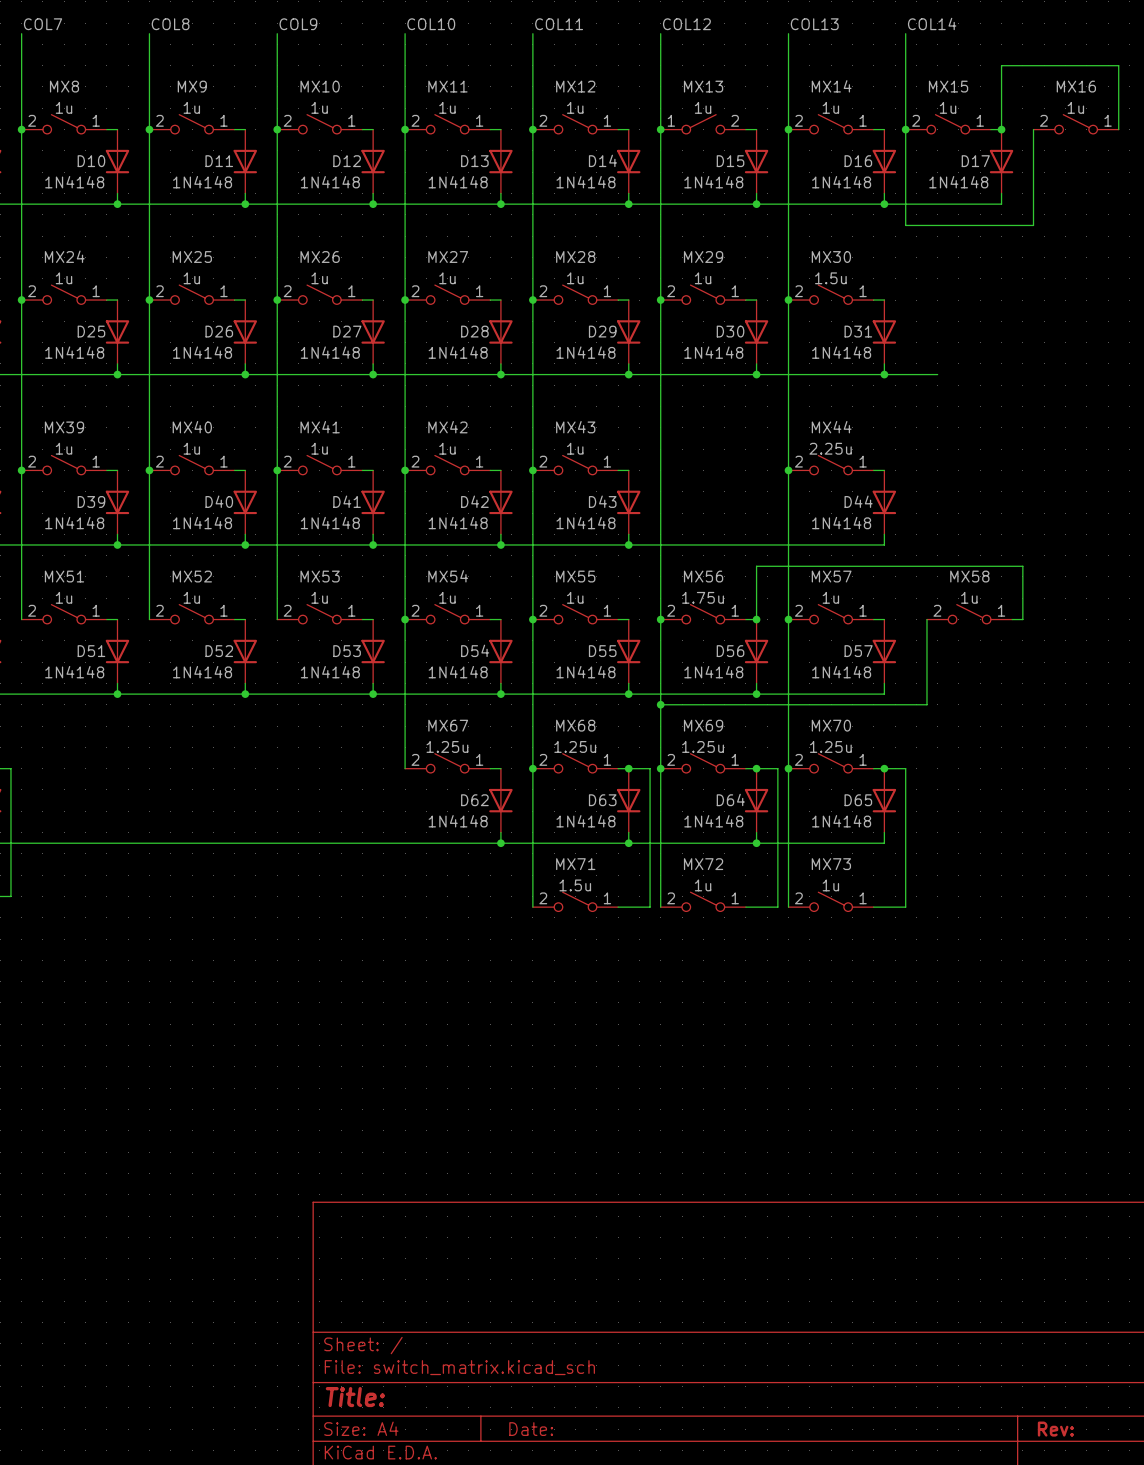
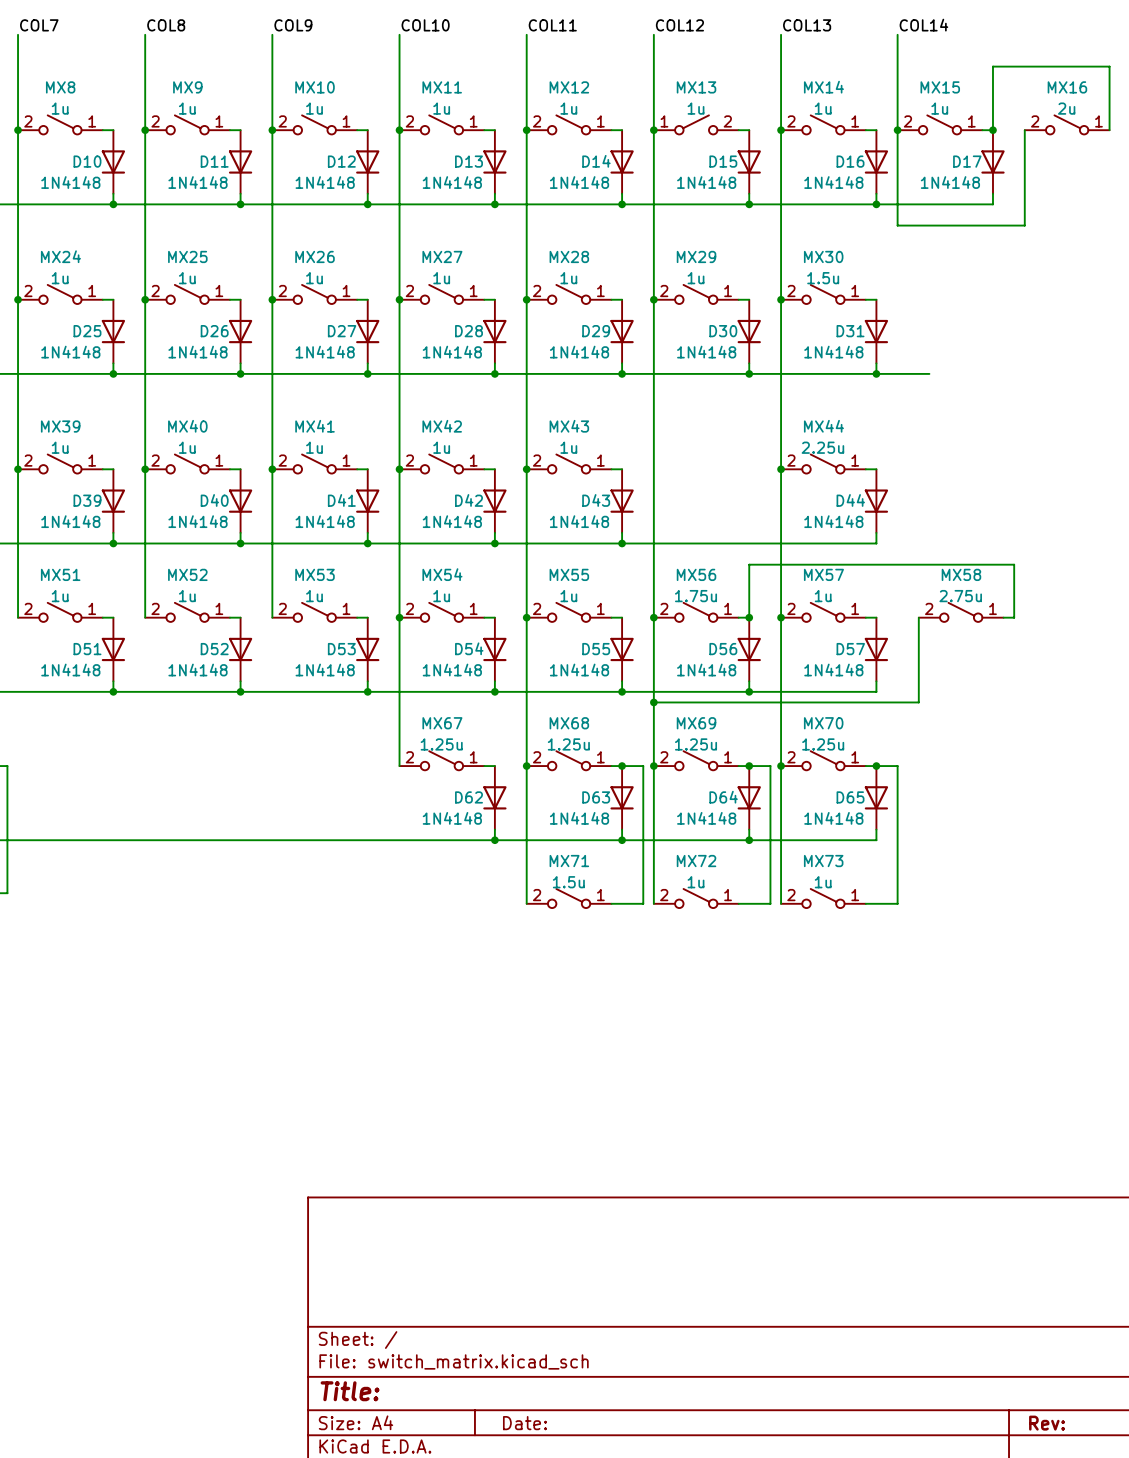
MX16 value: 1u (1075, 107) -> 2u (1066, 108)
MX58 value: 1u (969, 597) -> 2.75u (960, 596)

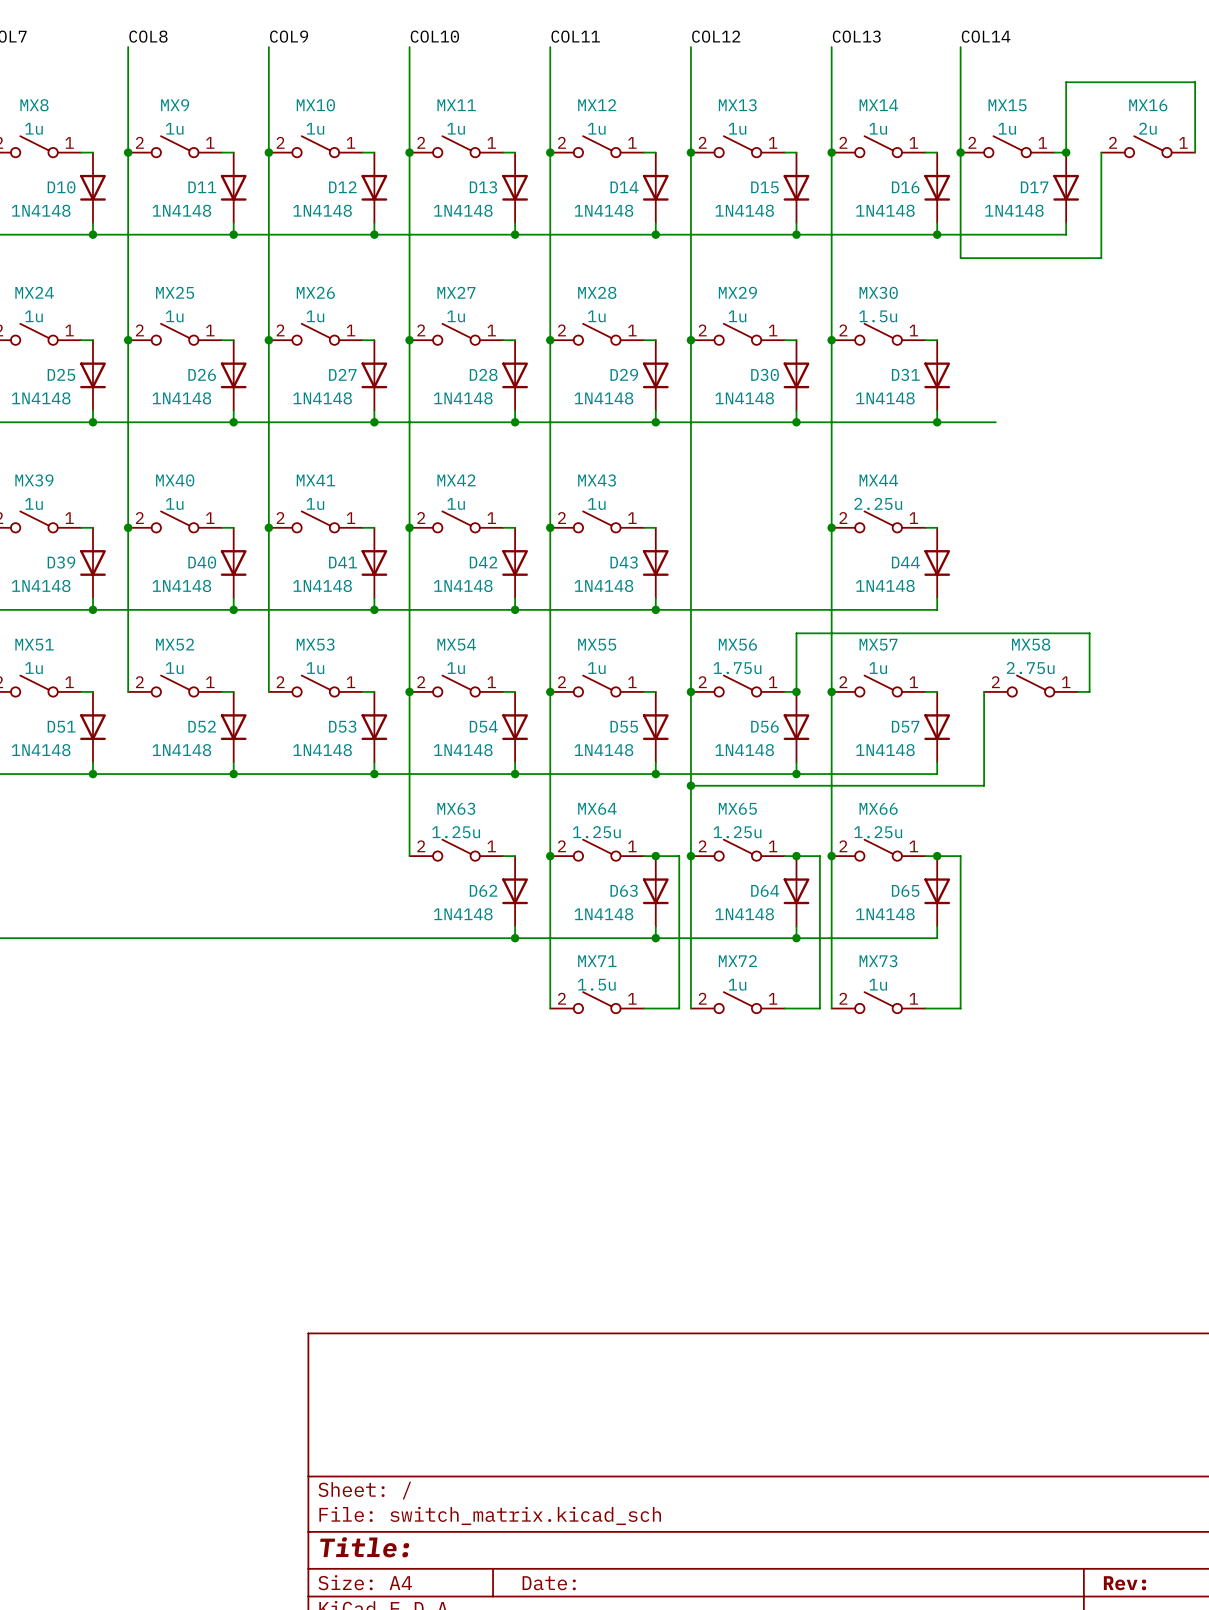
MX13 flip: as is (696, 124) -> left-right (737, 146)
MX67 name: MX67 (442, 723) -> MX63 (456, 808)
MX68 name: MX68 (569, 723) -> MX64 (597, 808)
MX69 name: MX69 (696, 723) -> MX65 (737, 808)
MX70 name: MX70 (823, 723) -> MX66 (878, 808)

